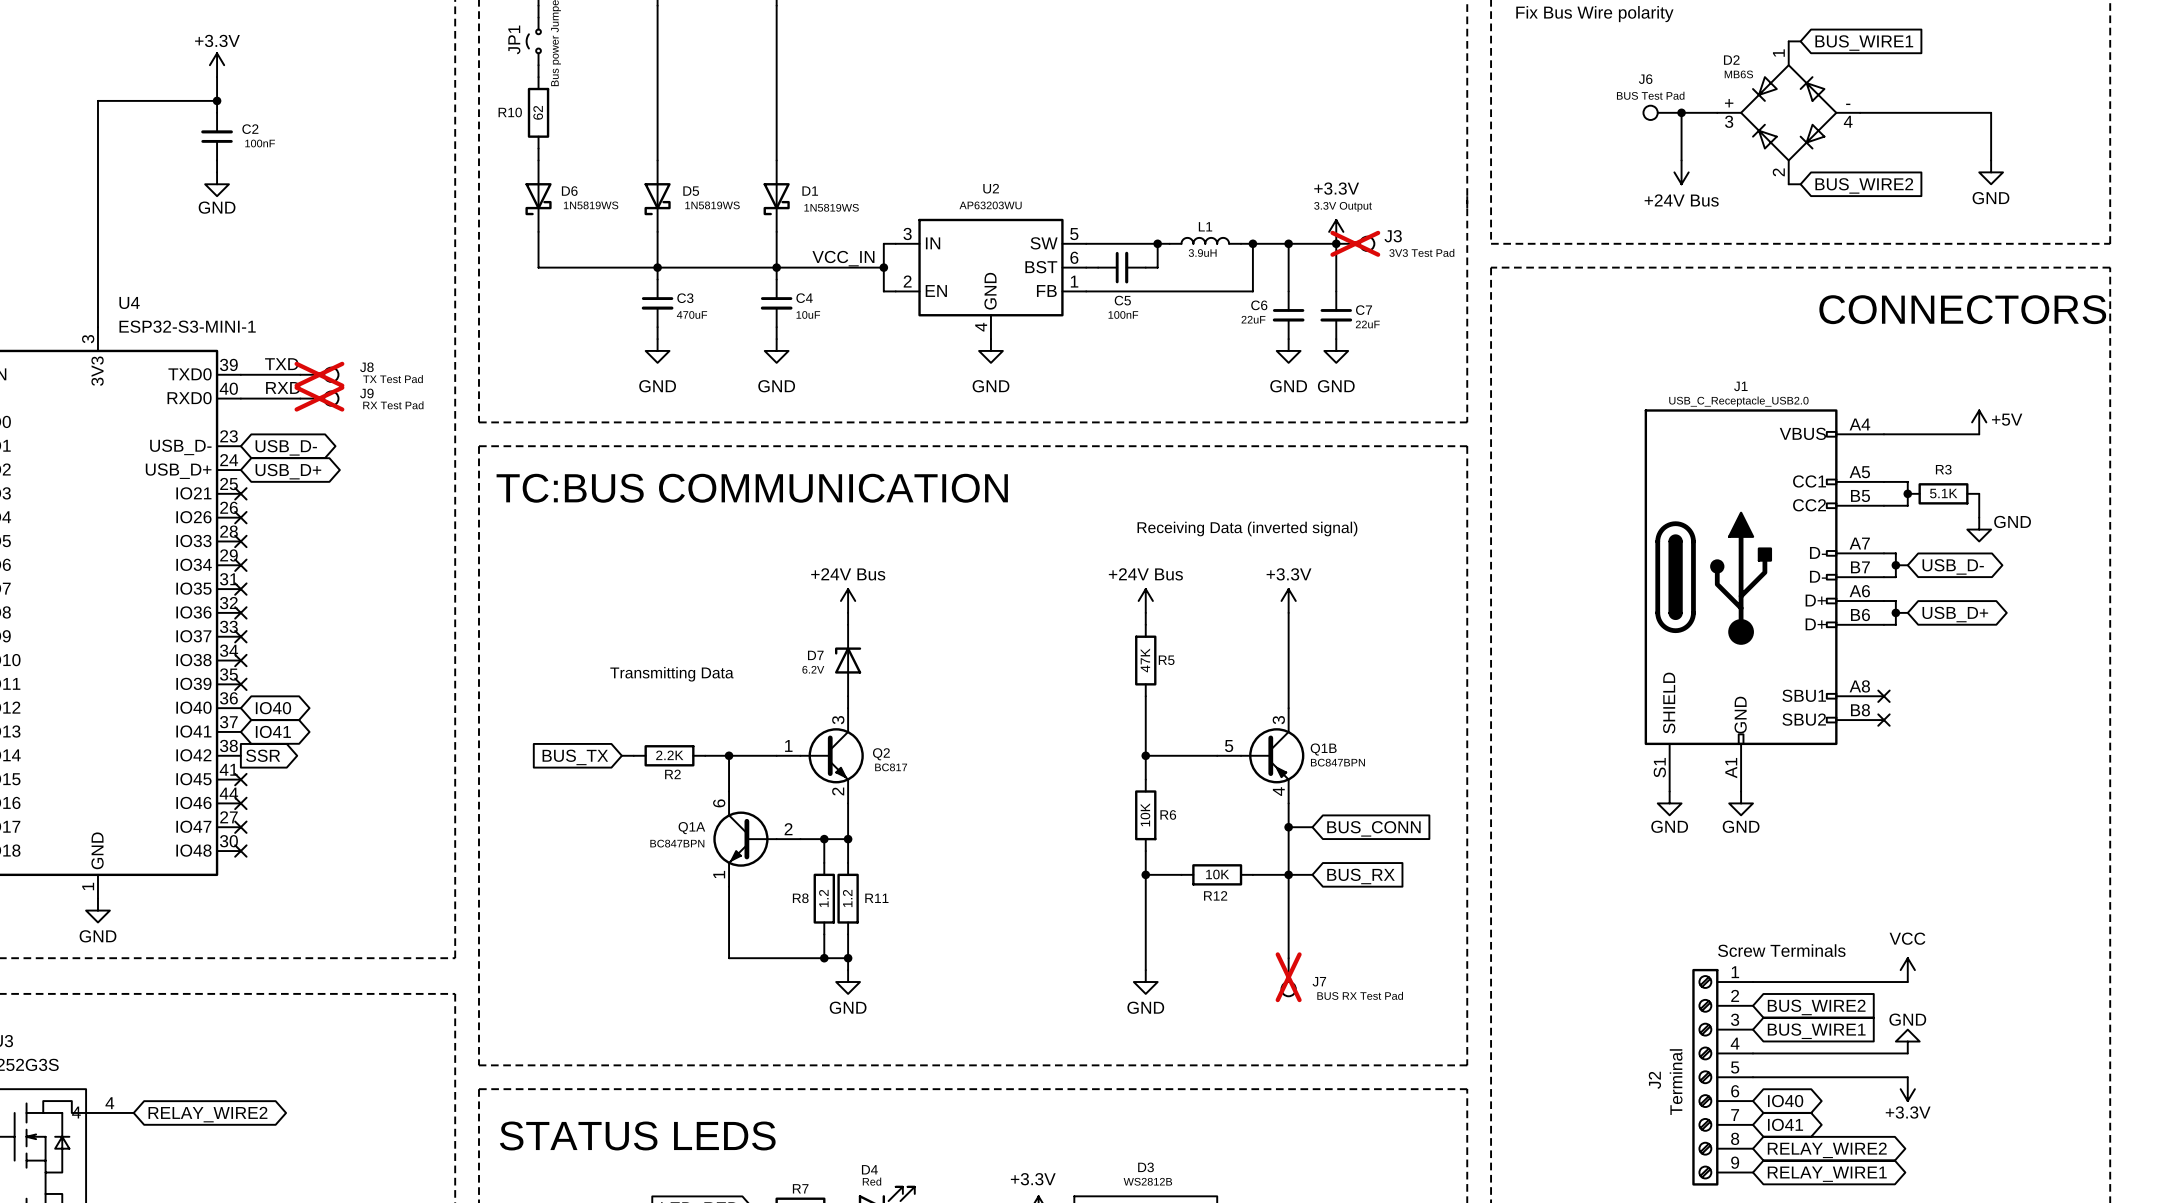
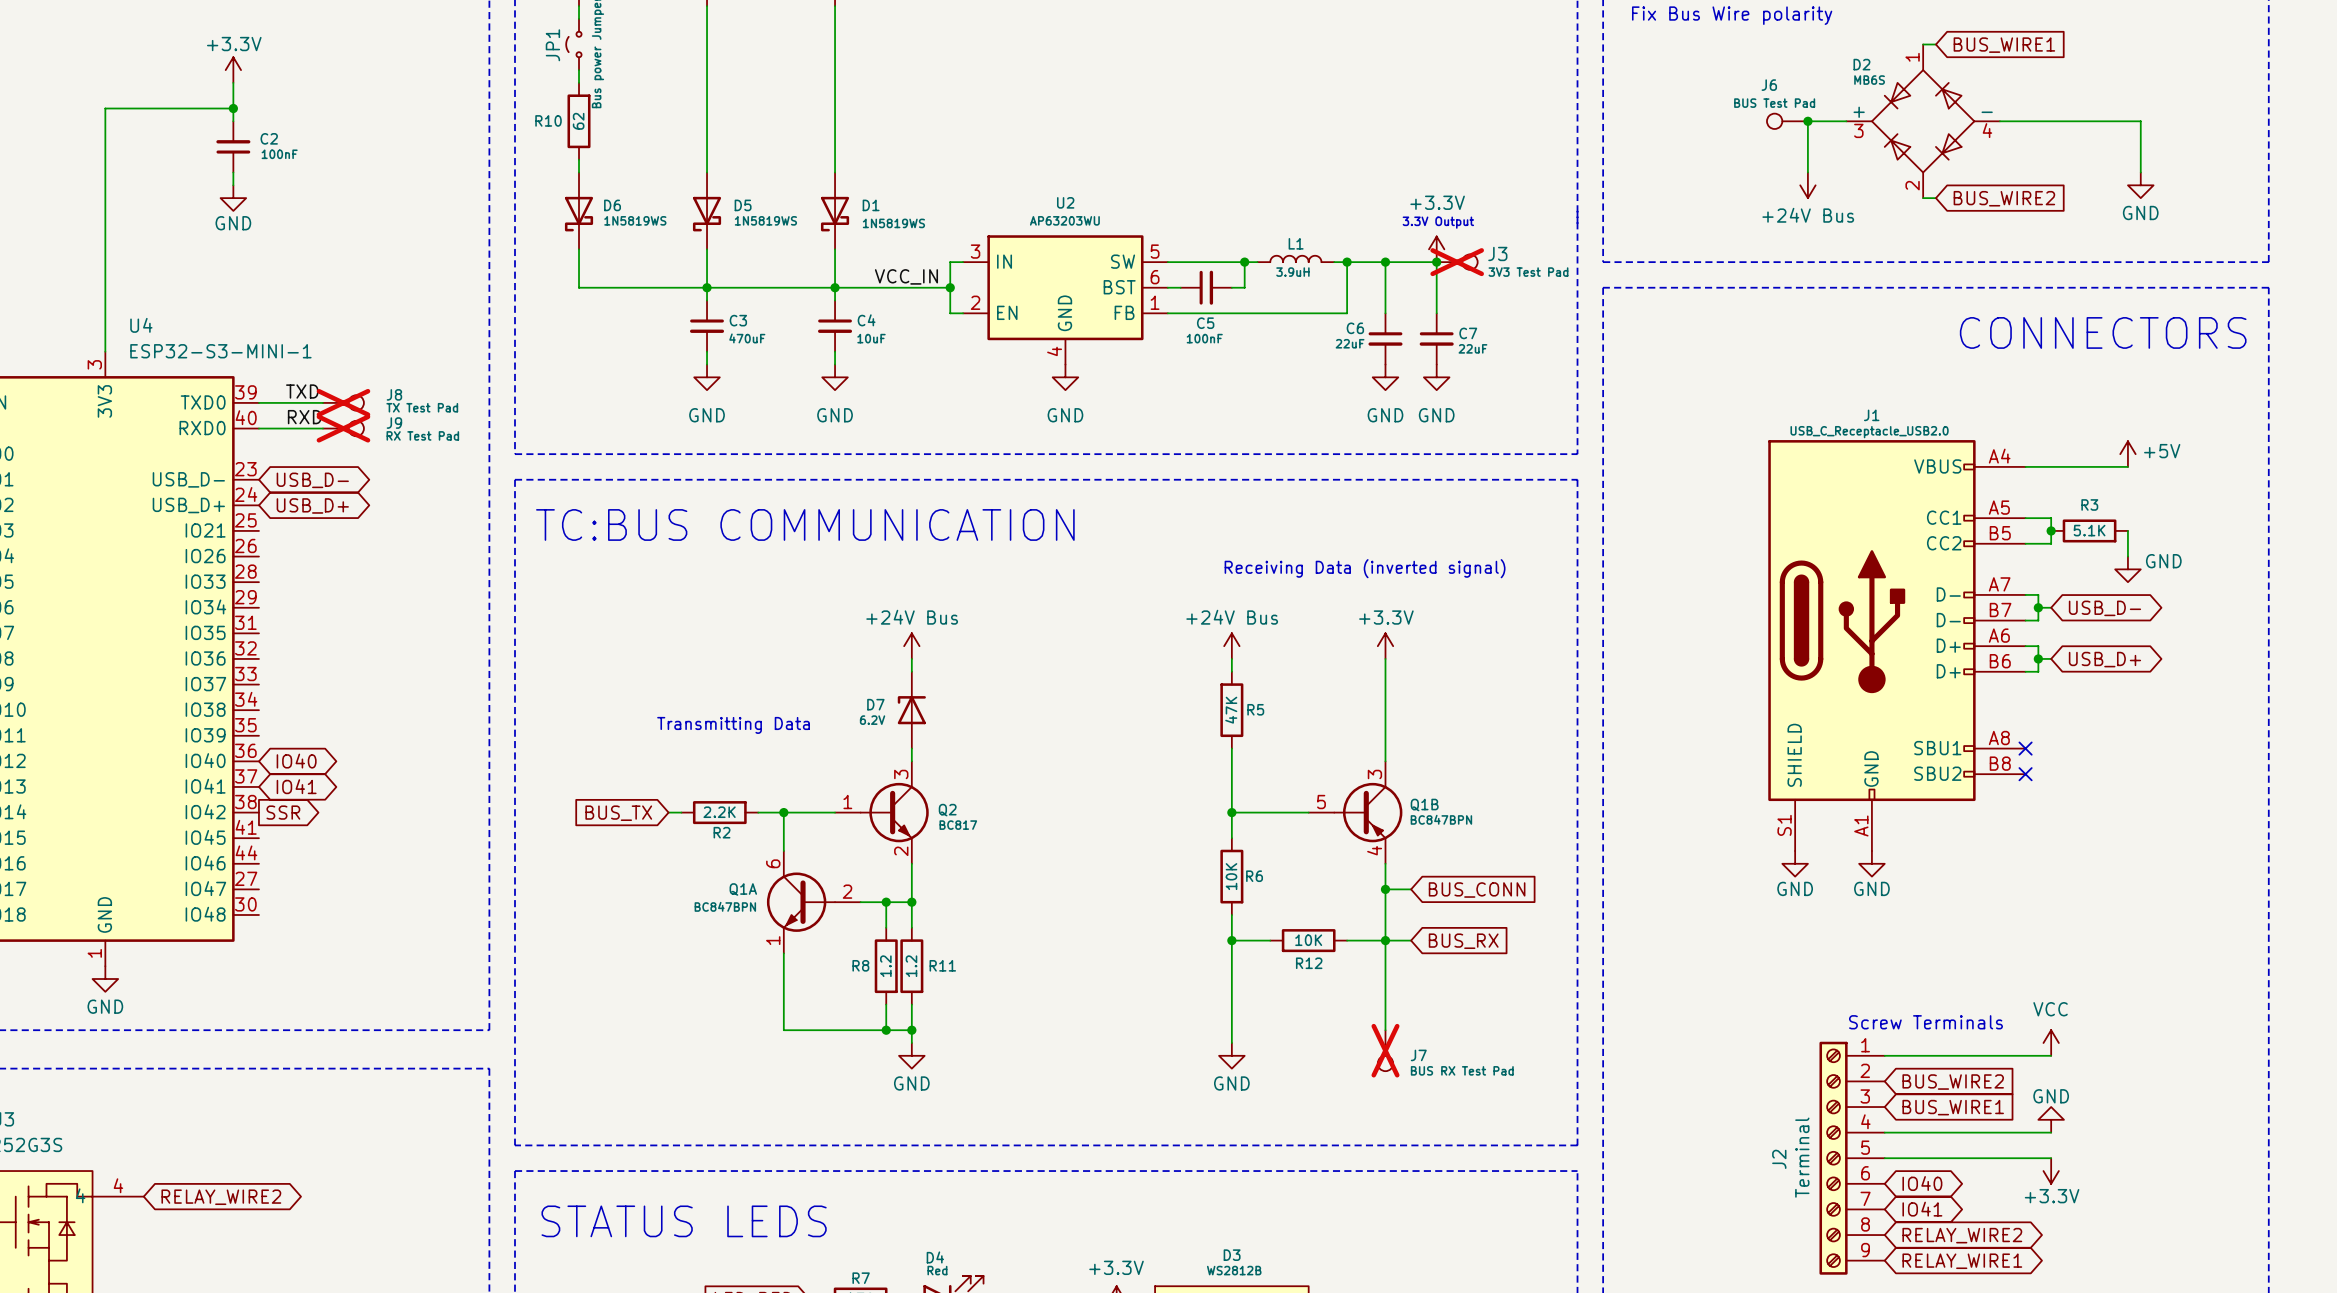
no-connect mark: (240, 493) -> none
no-connect mark: (240, 517) -> none
no-connect mark: (240, 541) -> none
no-connect mark: (240, 565) -> none
no-connect mark: (240, 589) -> none
no-connect mark: (240, 612) -> none
no-connect mark: (240, 636) -> none
no-connect mark: (240, 660) -> none
no-connect mark: (240, 684) -> none
no-connect mark: (240, 779) -> none
no-connect mark: (240, 803) -> none
no-connect mark: (240, 827) -> none
no-connect mark: (240, 851) -> none

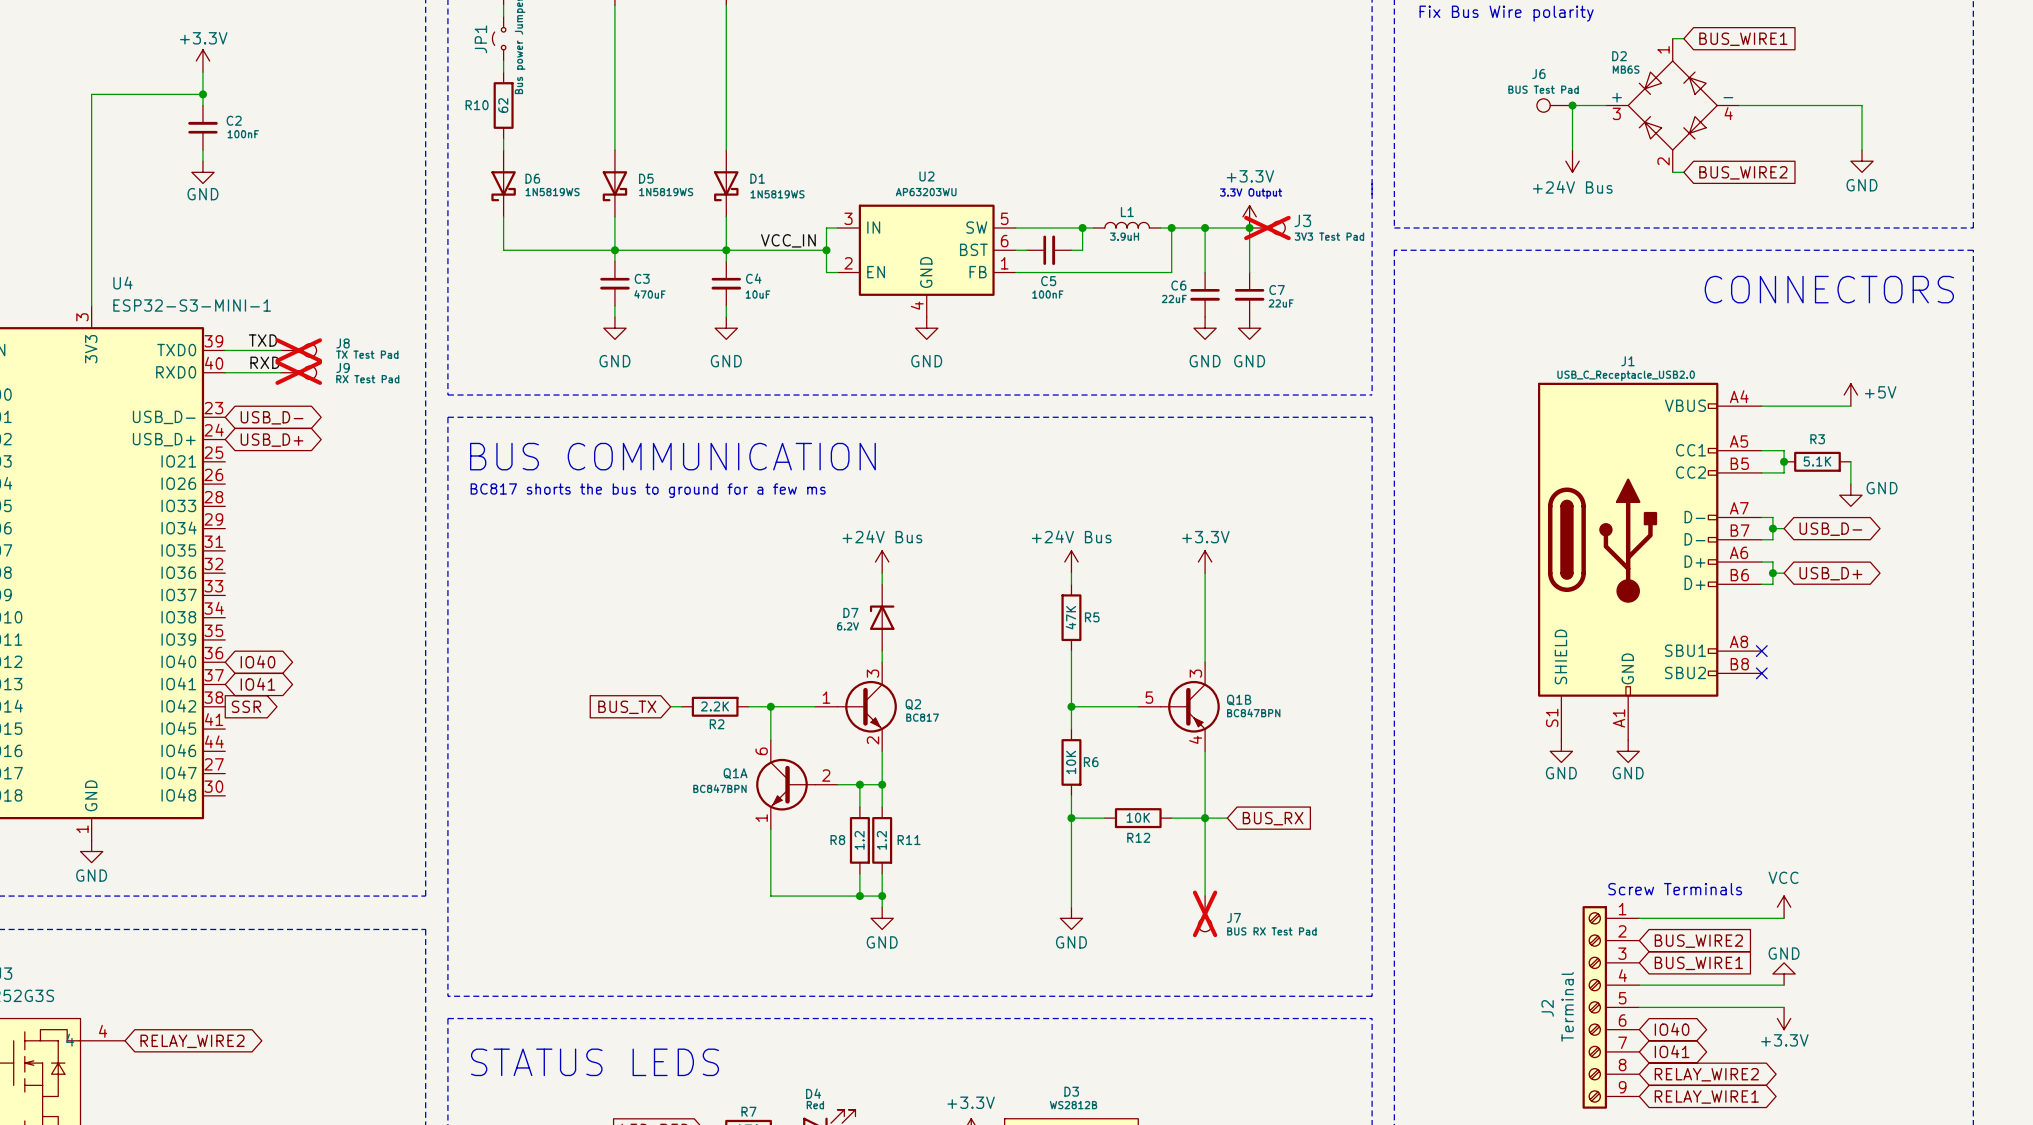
text: TC:BUS COMMUNICATION (805, 524) -> BUS COMMUNICATION (672, 456)
text: none -> BC817 shorts the bus to ground for a few ms (648, 490)
text: Receiving Data (inverted signal) (1365, 568) -> none
power symbol position: +24V Bus (911, 646) -> +24V Bus (882, 562)
wire: (911, 658) (911, 671) -> (882, 573) (882, 584)
D7 position: (911, 710) -> (882, 617)
text: Transmitting Data (733, 725) -> none
wire: (911, 748) (911, 761) -> (882, 651) (882, 662)
wire: (668, 812) (681, 812) -> none
R2 position: (719, 812) -> (715, 706)
wire: (758, 812) (771, 812) -> none
junction: (783, 812) -> none
wire: (835, 812) (783, 812) (783, 850) -> none
wire: none -> (748, 706) (815, 706)
Q2 position: (881, 812) -> (856, 706)
wire: none -> (770, 706) (770, 740)
junction: none -> (770, 706)
global label position: BUS_TX (618, 813) -> BUS_TX (627, 707)
wire: (911, 863) (911, 927) -> (882, 751) (882, 806)
wire: (1385, 889) (1411, 889) -> none
junction: (1385, 889) -> none
global label: BUS_CONN (1477, 890) -> none
Q1A position: (813, 902) -> (796, 784)
wire: (860, 902) (911, 902) -> (837, 784) (882, 784)
wire: (886, 902) (886, 927) -> (859, 784) (859, 806)
junction: (886, 902) -> none
junction: (911, 902) -> none
junction: none -> (859, 784)
junction: none -> (882, 784)
wire: (783, 953) (783, 1030) (886, 1030) -> none
wire: none -> (770, 829) (770, 873)
R8 position: (886, 966) -> (859, 840)
R11 position: (911, 966) -> (882, 840)
wire: (911, 1004) (911, 1043) -> (882, 873) (882, 907)
wire: none -> (859, 873) (859, 896)
junction: (886, 1030) -> none
wire: none -> (793, 896) (882, 896)
junction: (911, 1030) -> none
junction: none -> (859, 896)
junction: none -> (882, 896)
power symbol position: GND (911, 1055) -> GND (882, 918)

